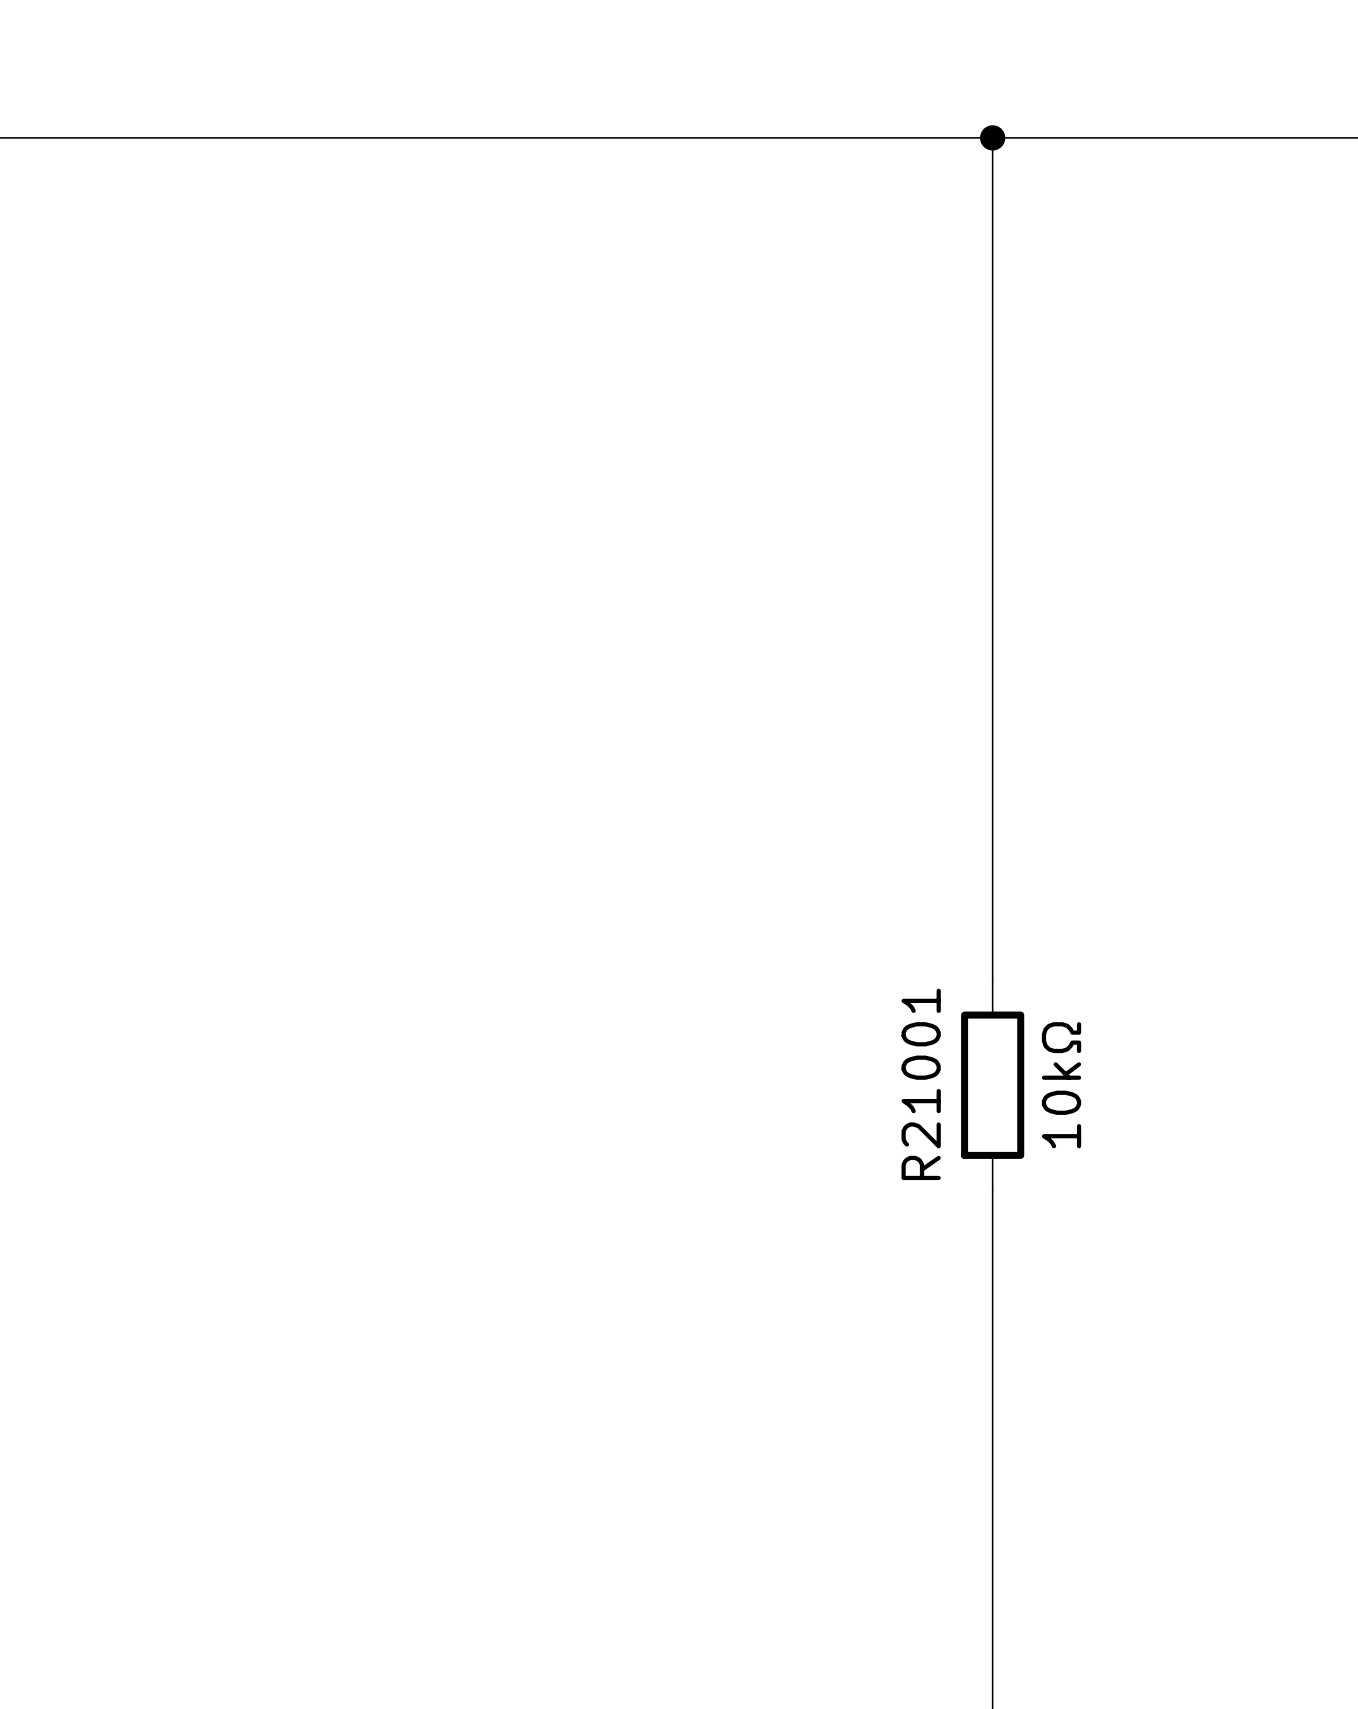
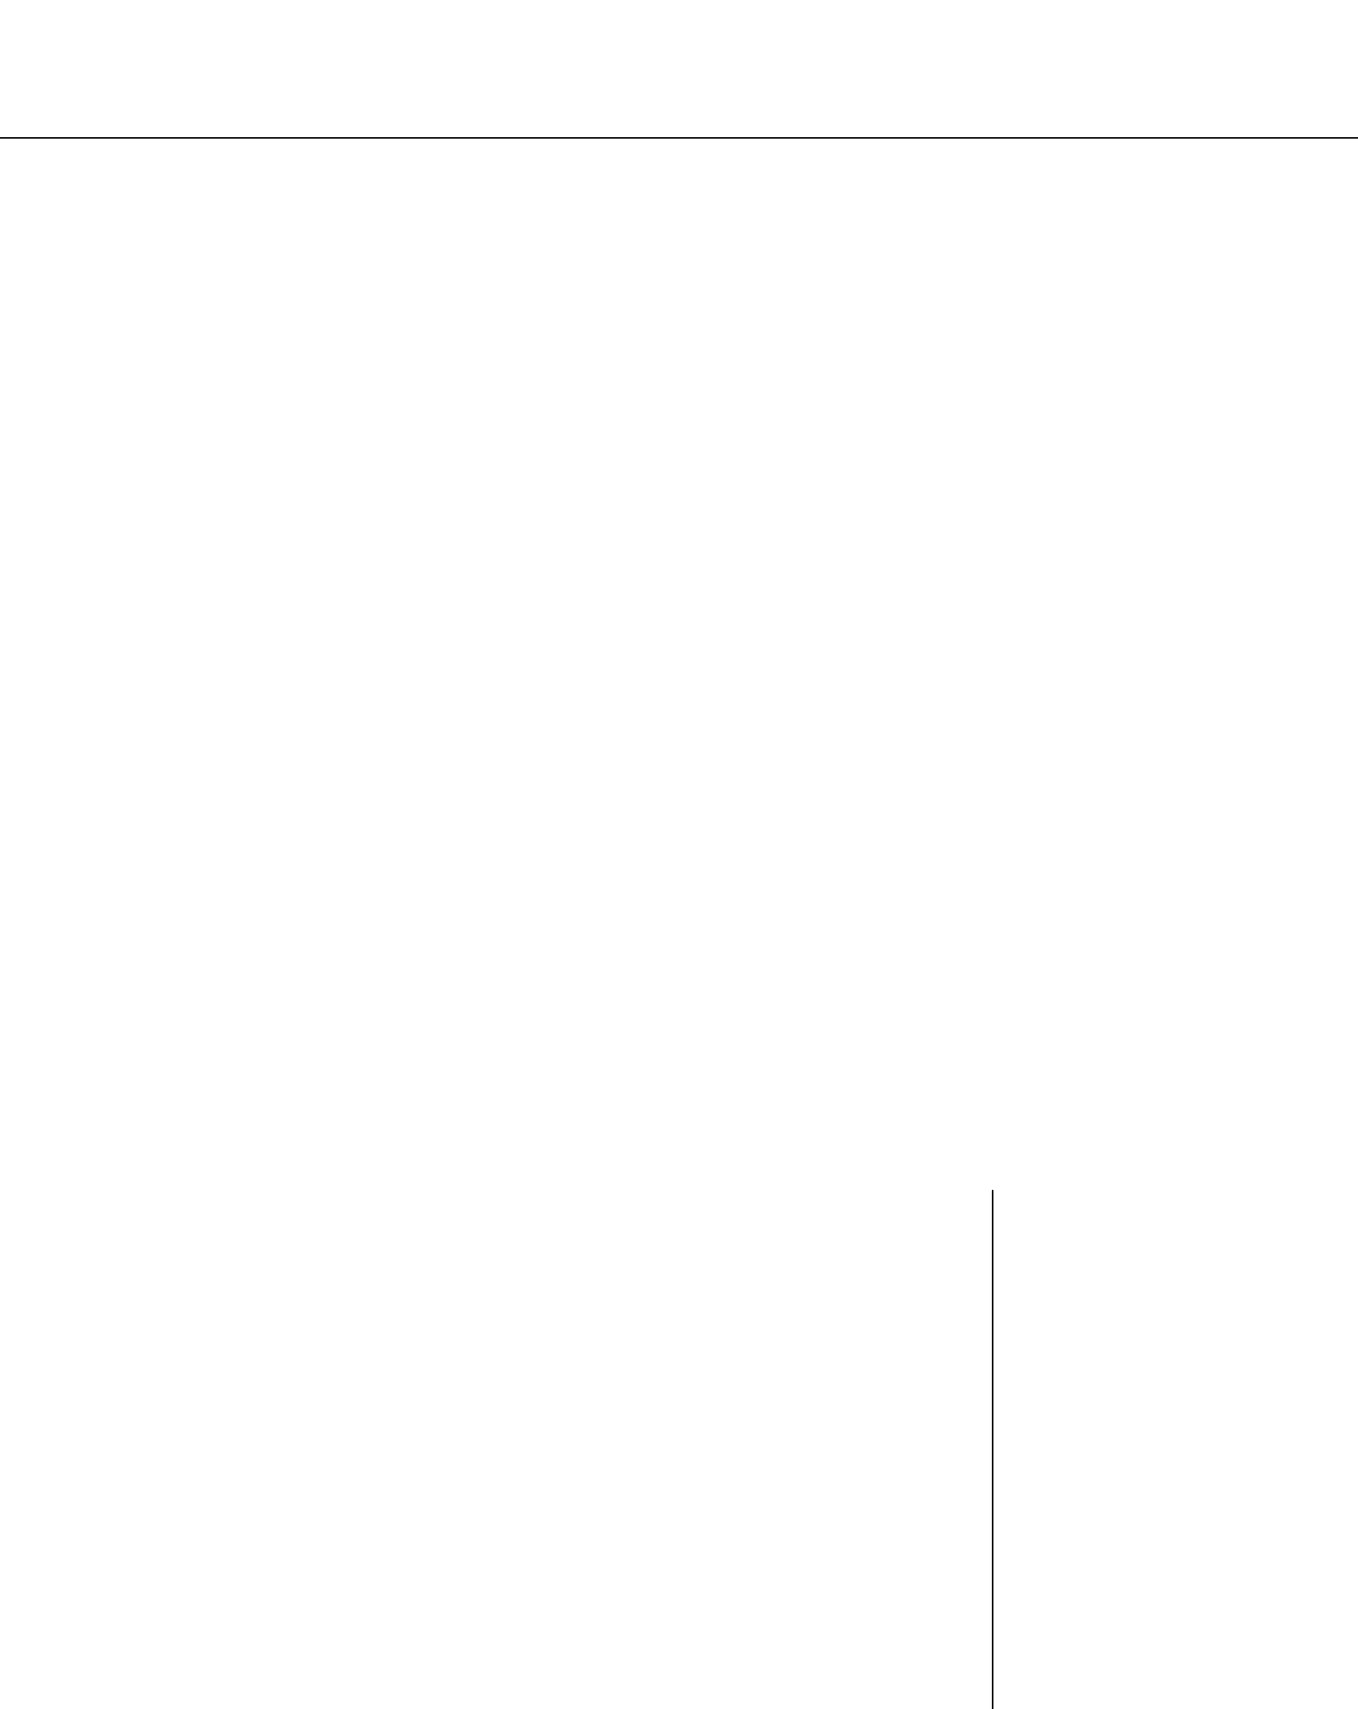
wire: (992, 137) (992, 979) -> none
junction: (992, 137) -> none
R21001: 10kΩ (992, 1085) -> none

